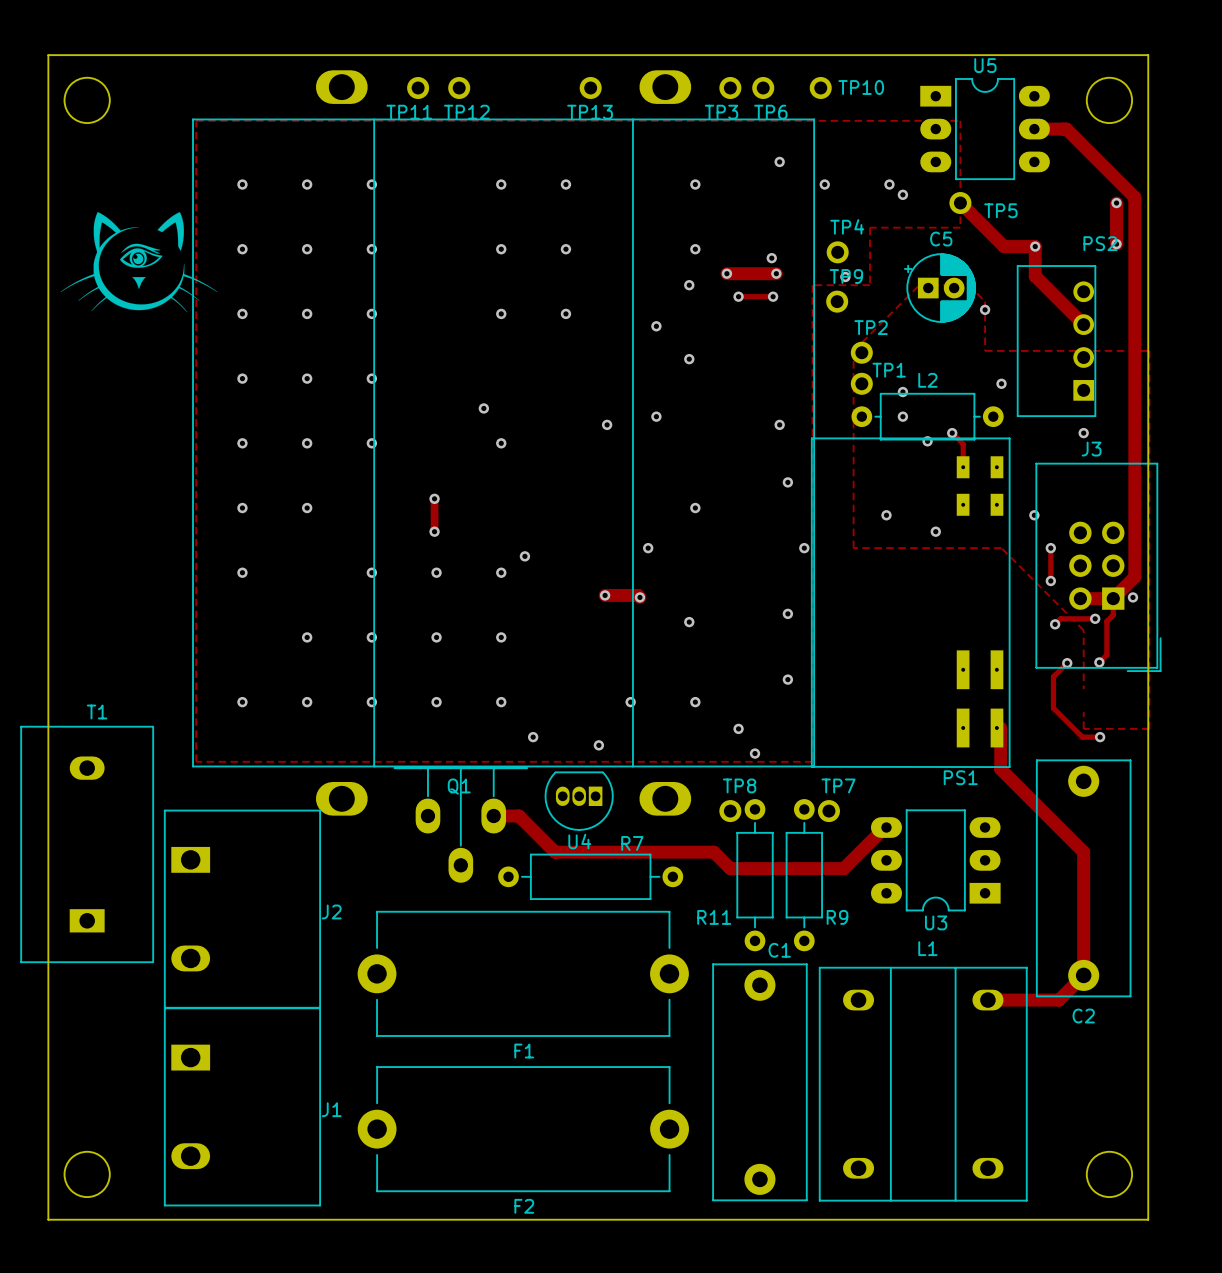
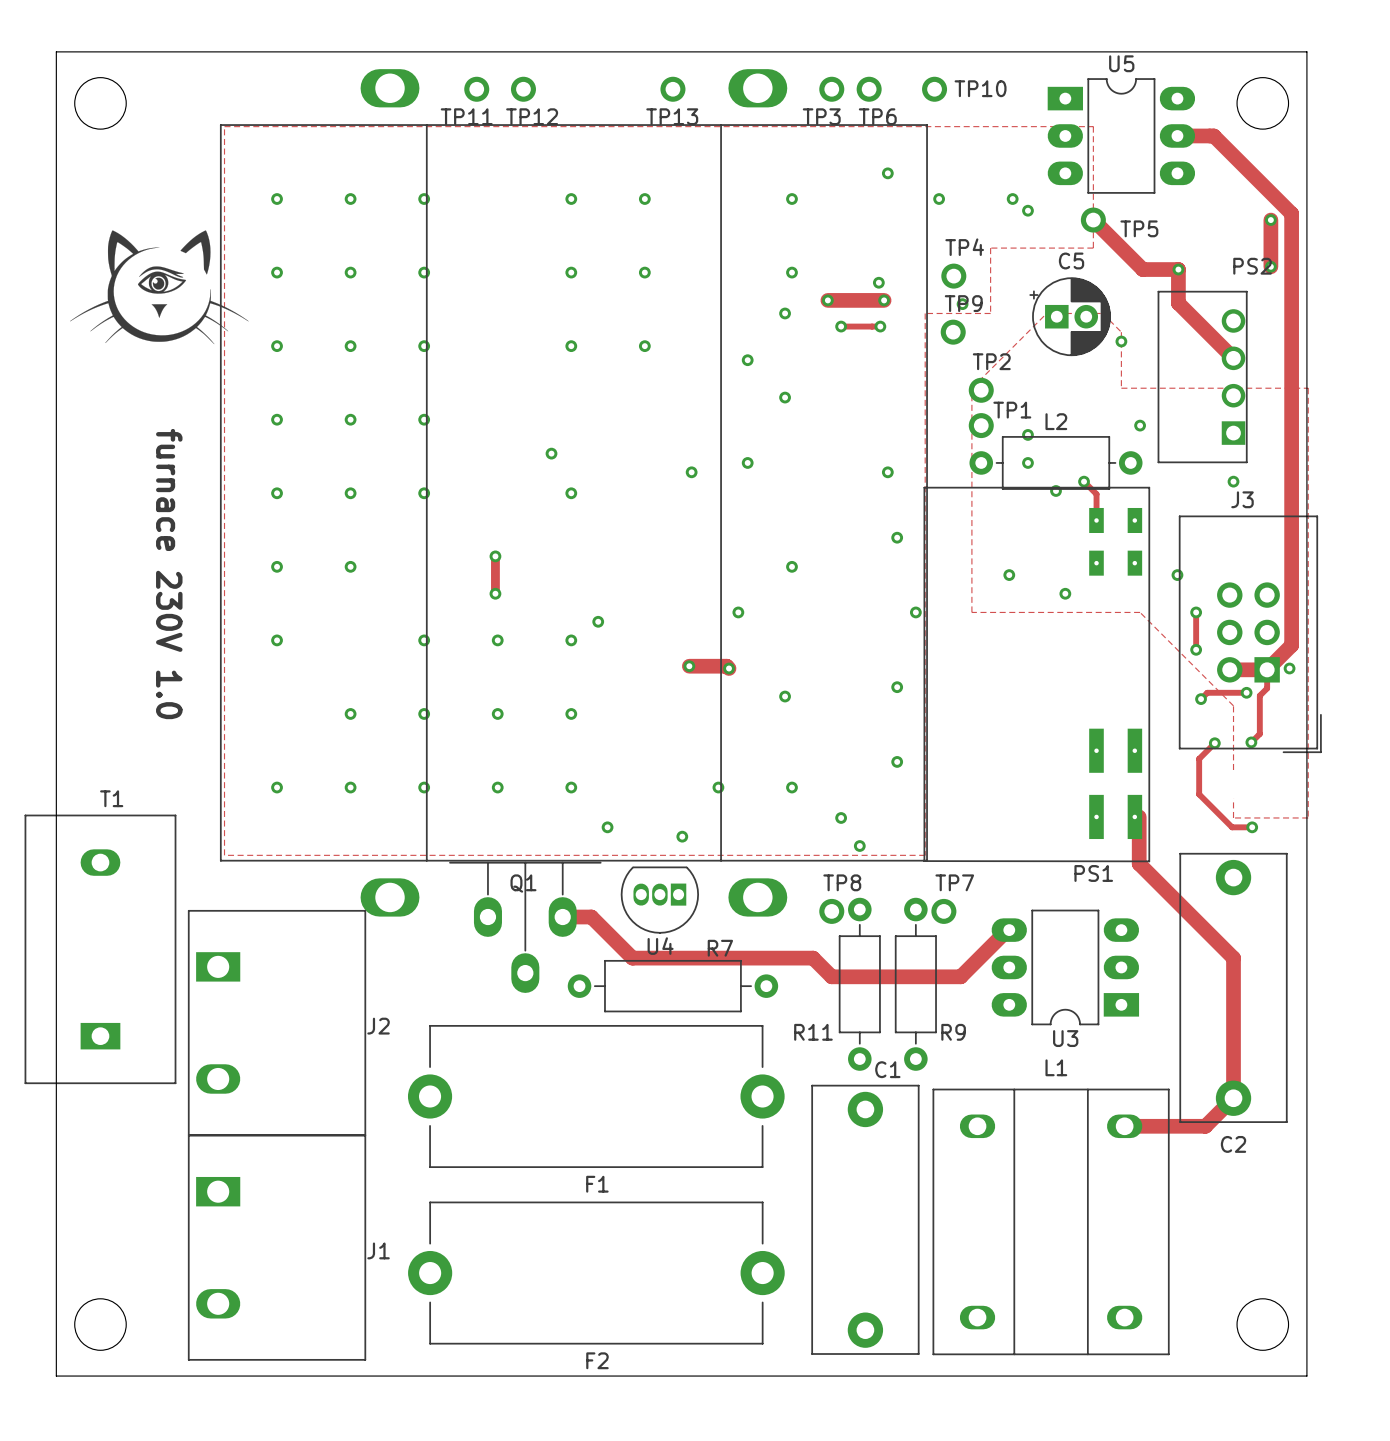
text: none -> furnace 230V 1.0 (169, 574)

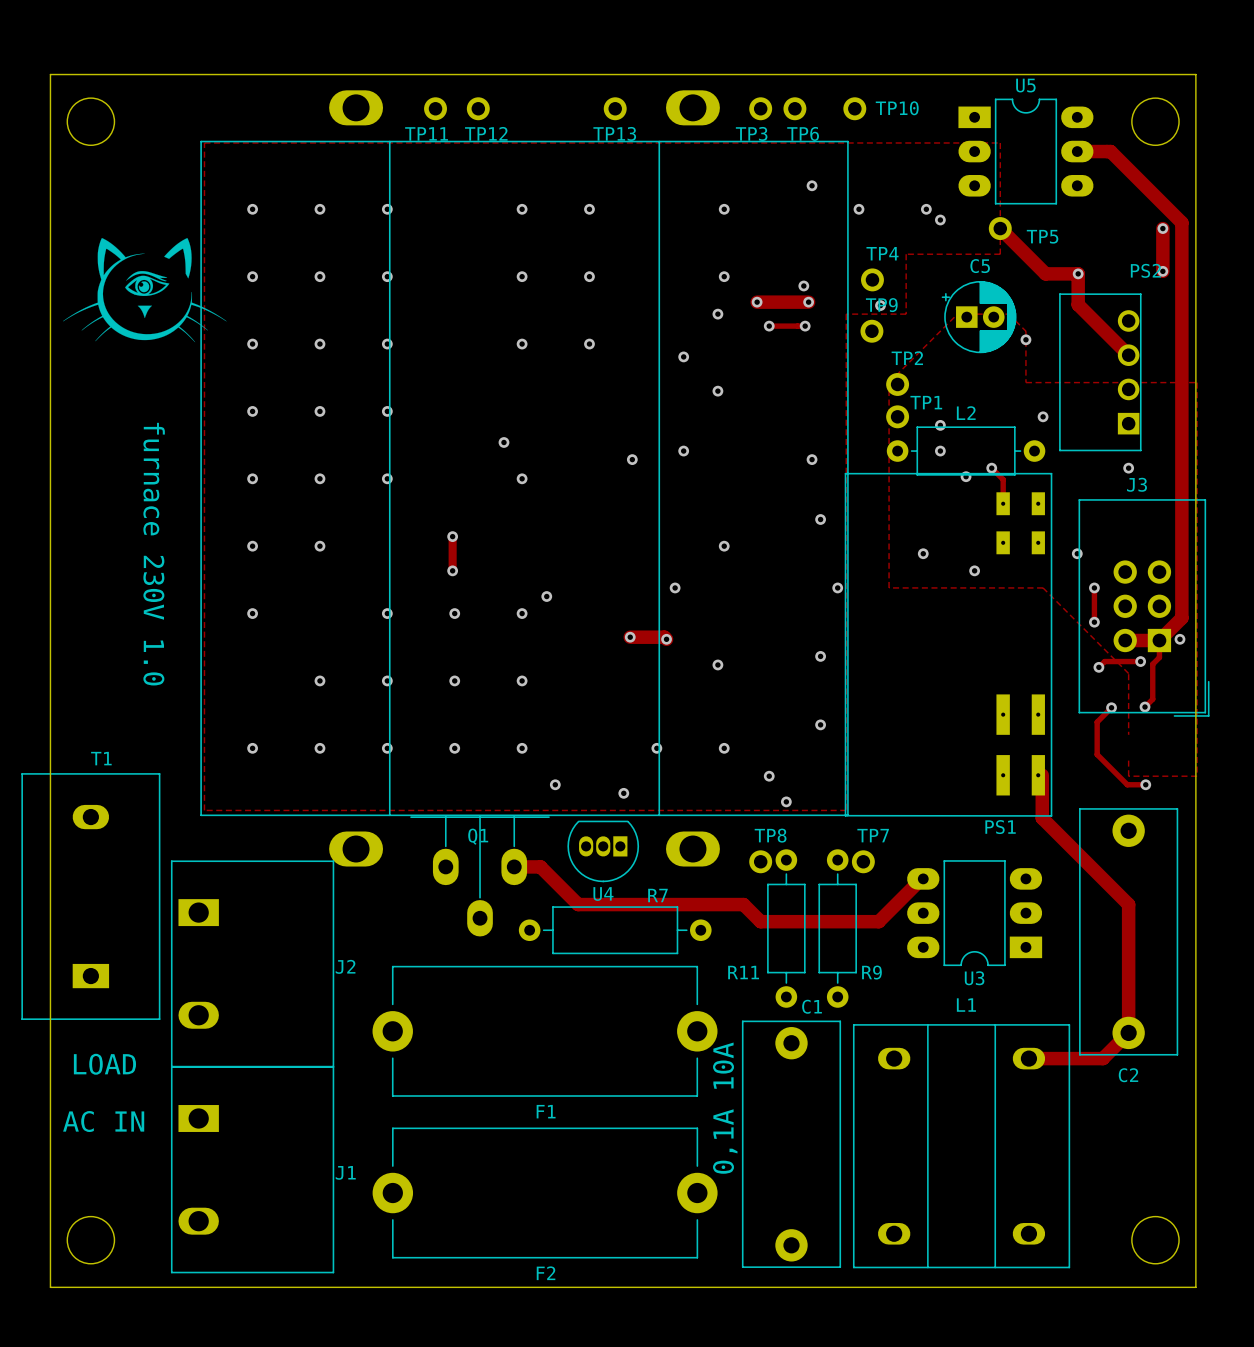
text: none -> LOAD (104, 1064)
text: none -> 0,1A 10A (725, 1108)
text: none -> AC IN (103, 1121)

